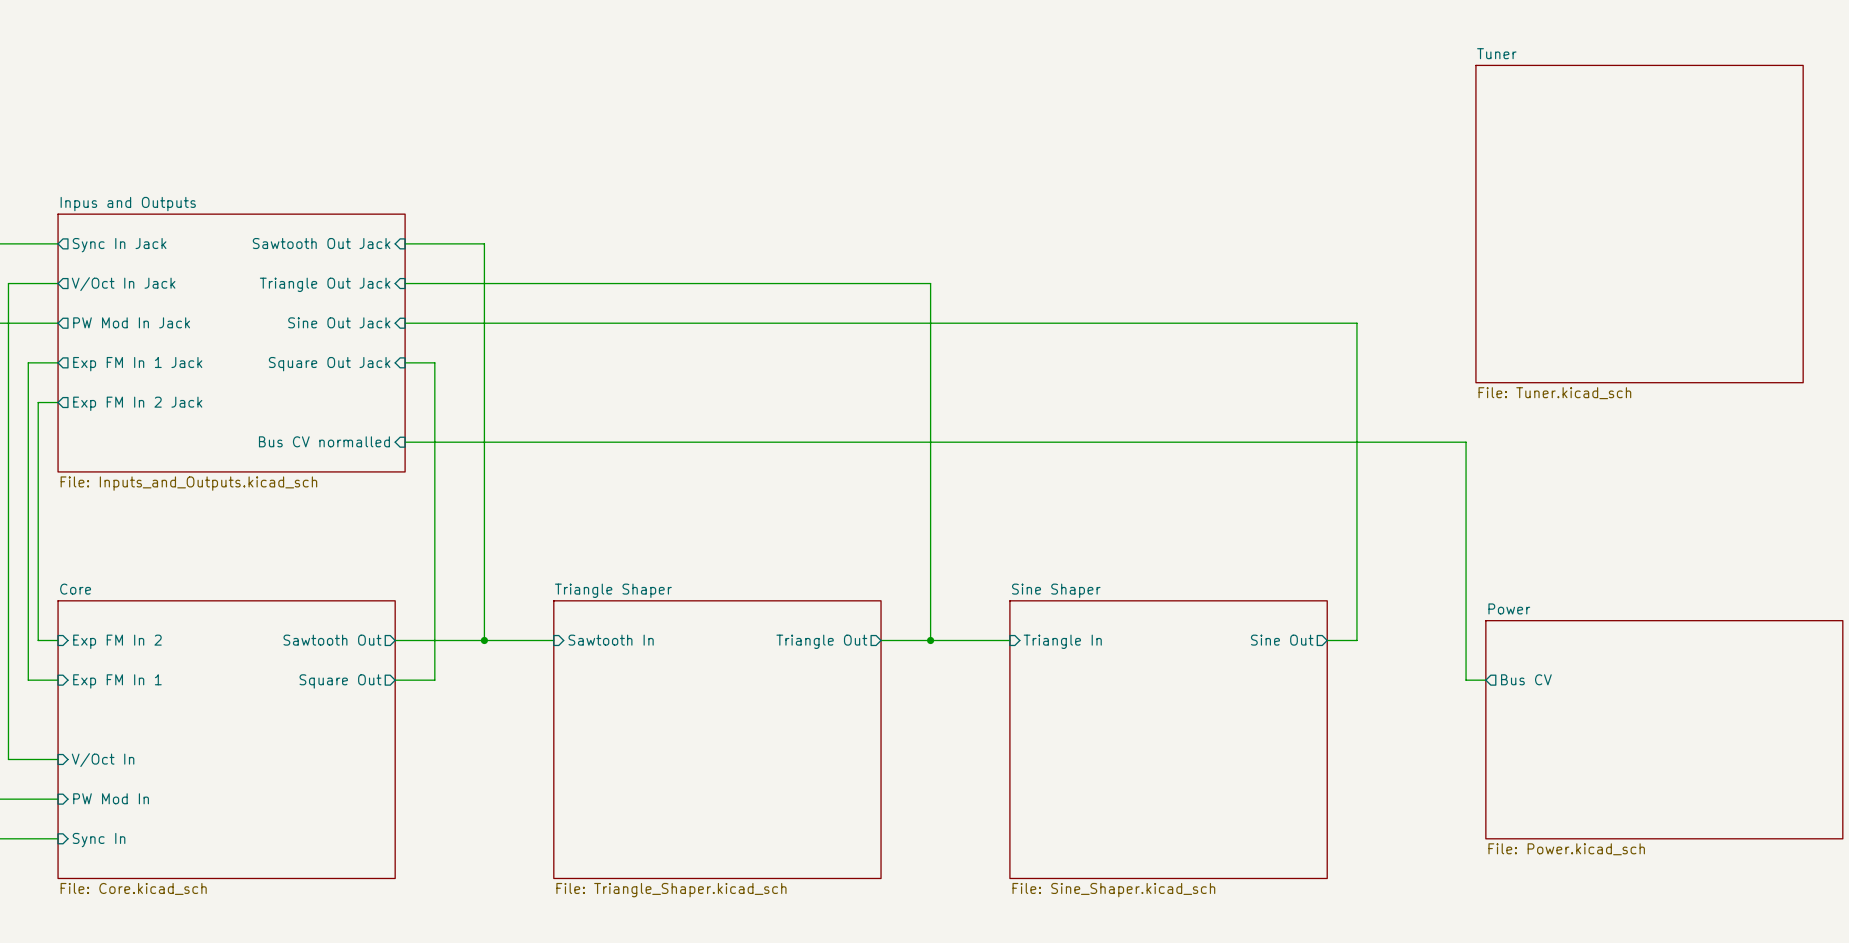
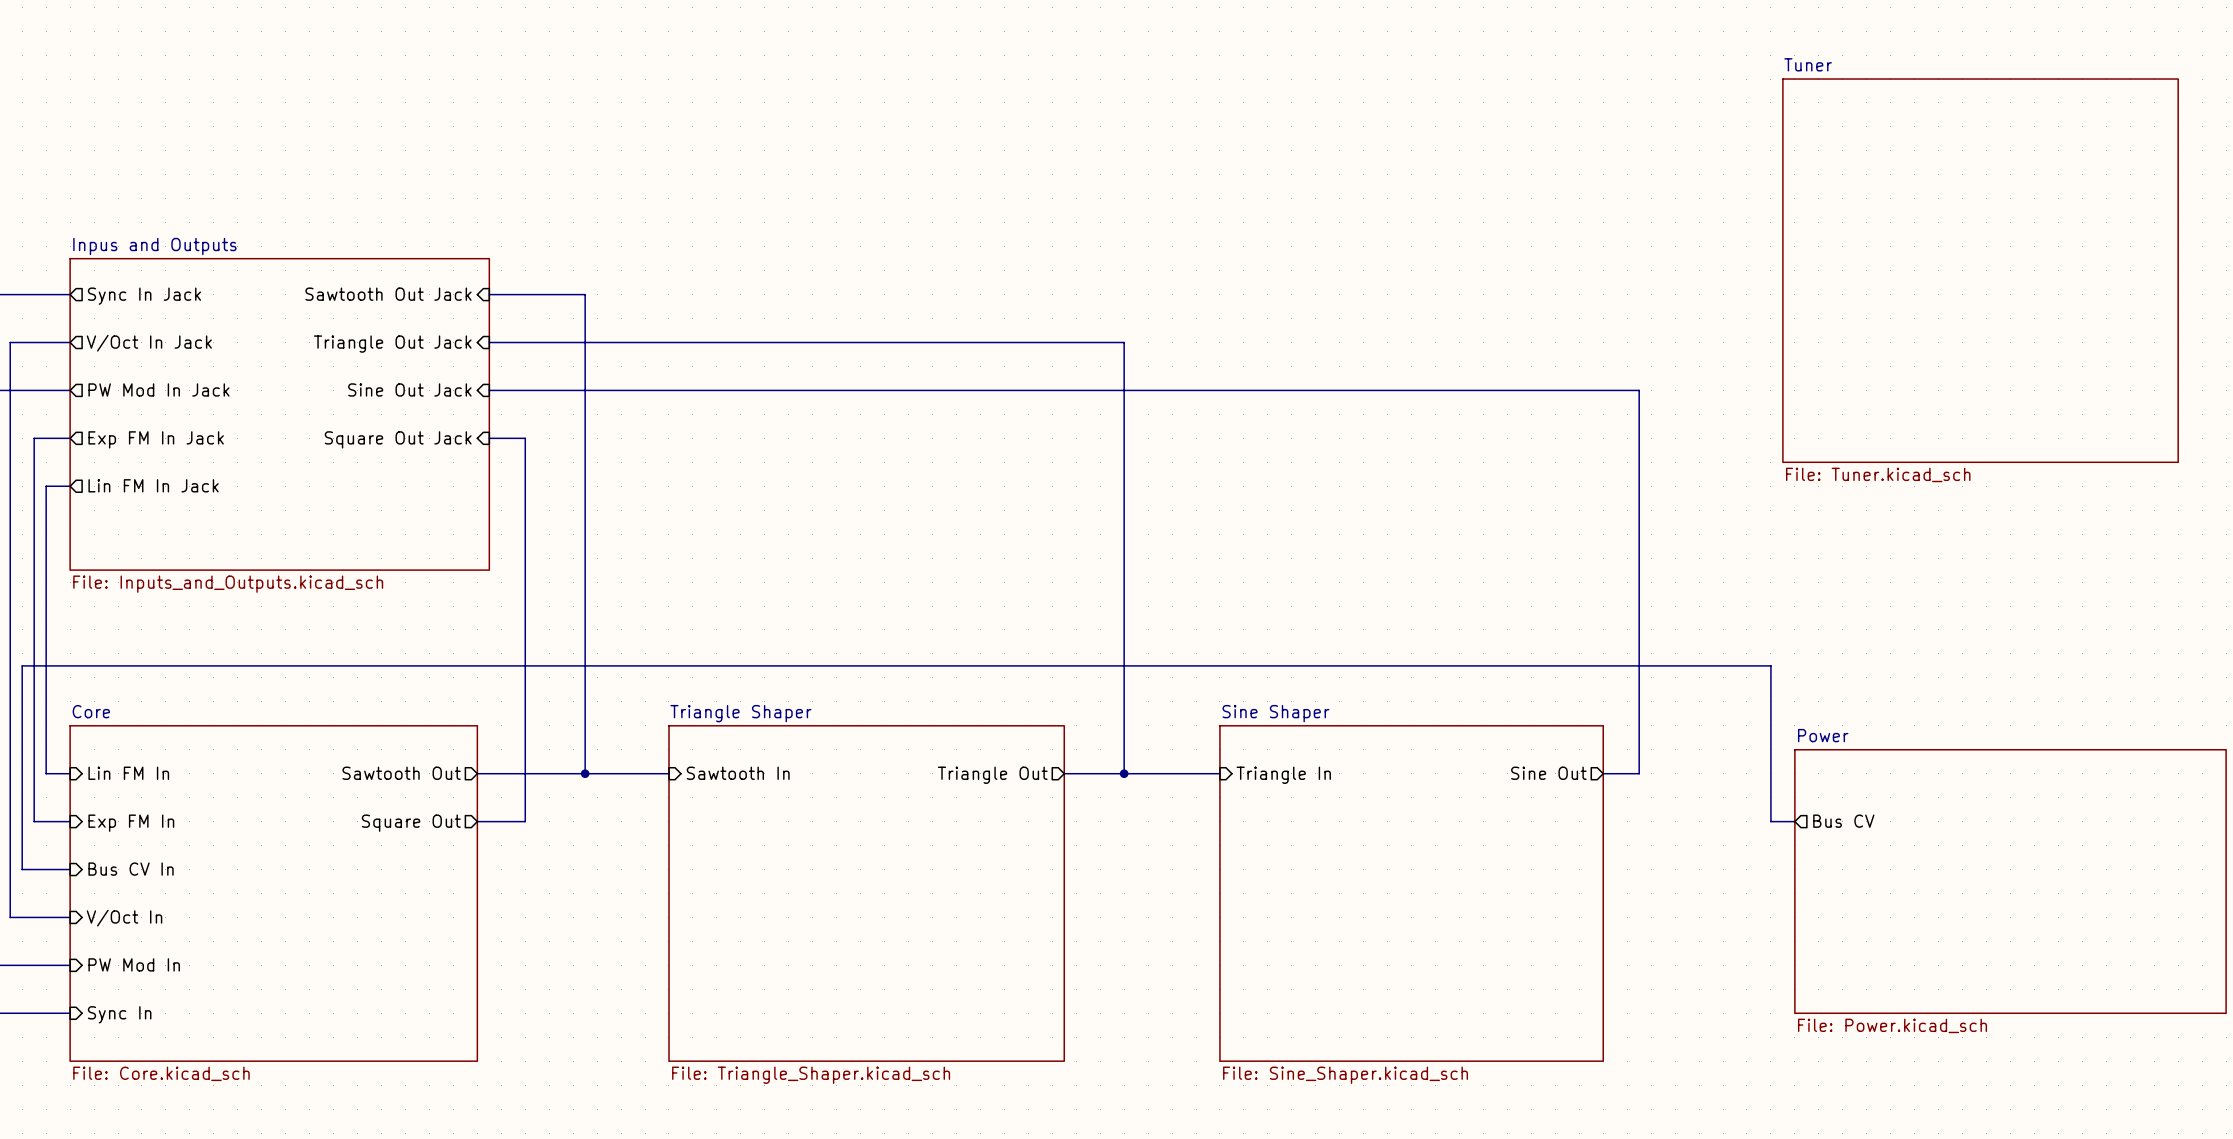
sheet pin: Exp FM In 1 Jack (137, 364) -> Exp FM In Jack (156, 439)
sheet pin: Exp FM In 2 Jack (137, 403) -> Lin FM In Jack (153, 485)
sheet pin: Bus CV normalled (324, 441) -> none
wire: (405, 442) (1466, 442) (1466, 551) -> (70, 869) (22, 869) (22, 665) (1770, 665)
sheet pin: Exp FM In 2 (117, 641) -> Lin FM In (128, 773)
sheet pin: Exp FM In 1 (117, 681) -> Exp FM In (131, 823)
sheet pin: none -> Bus CV In (131, 869)

